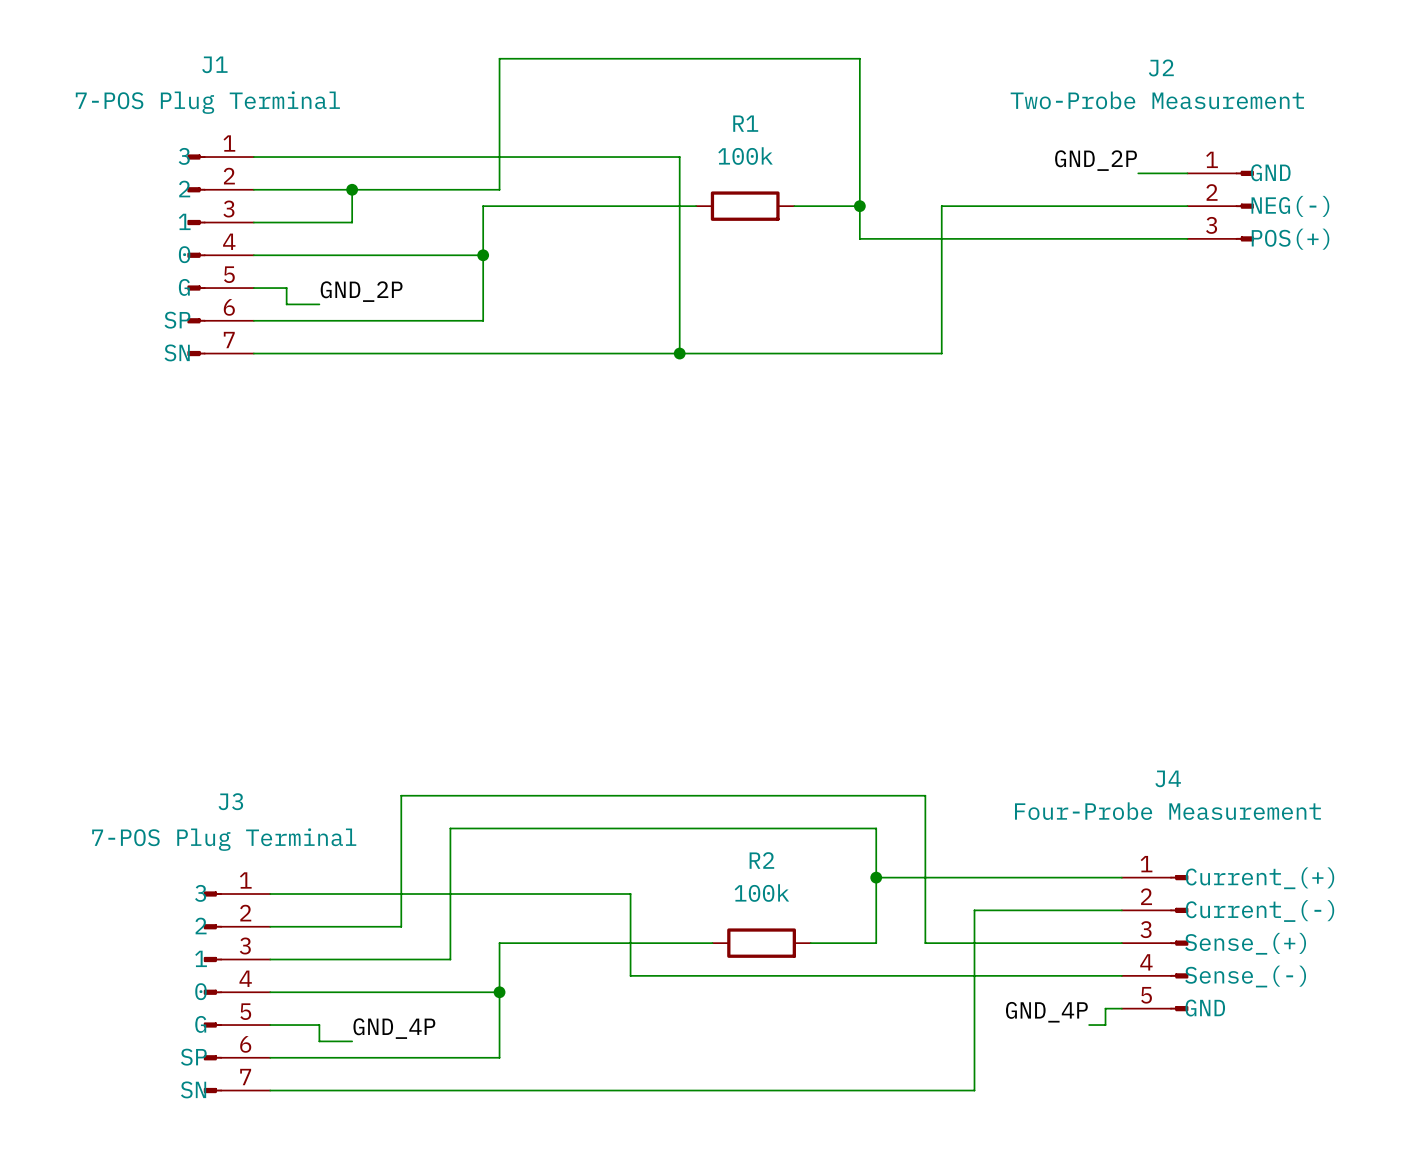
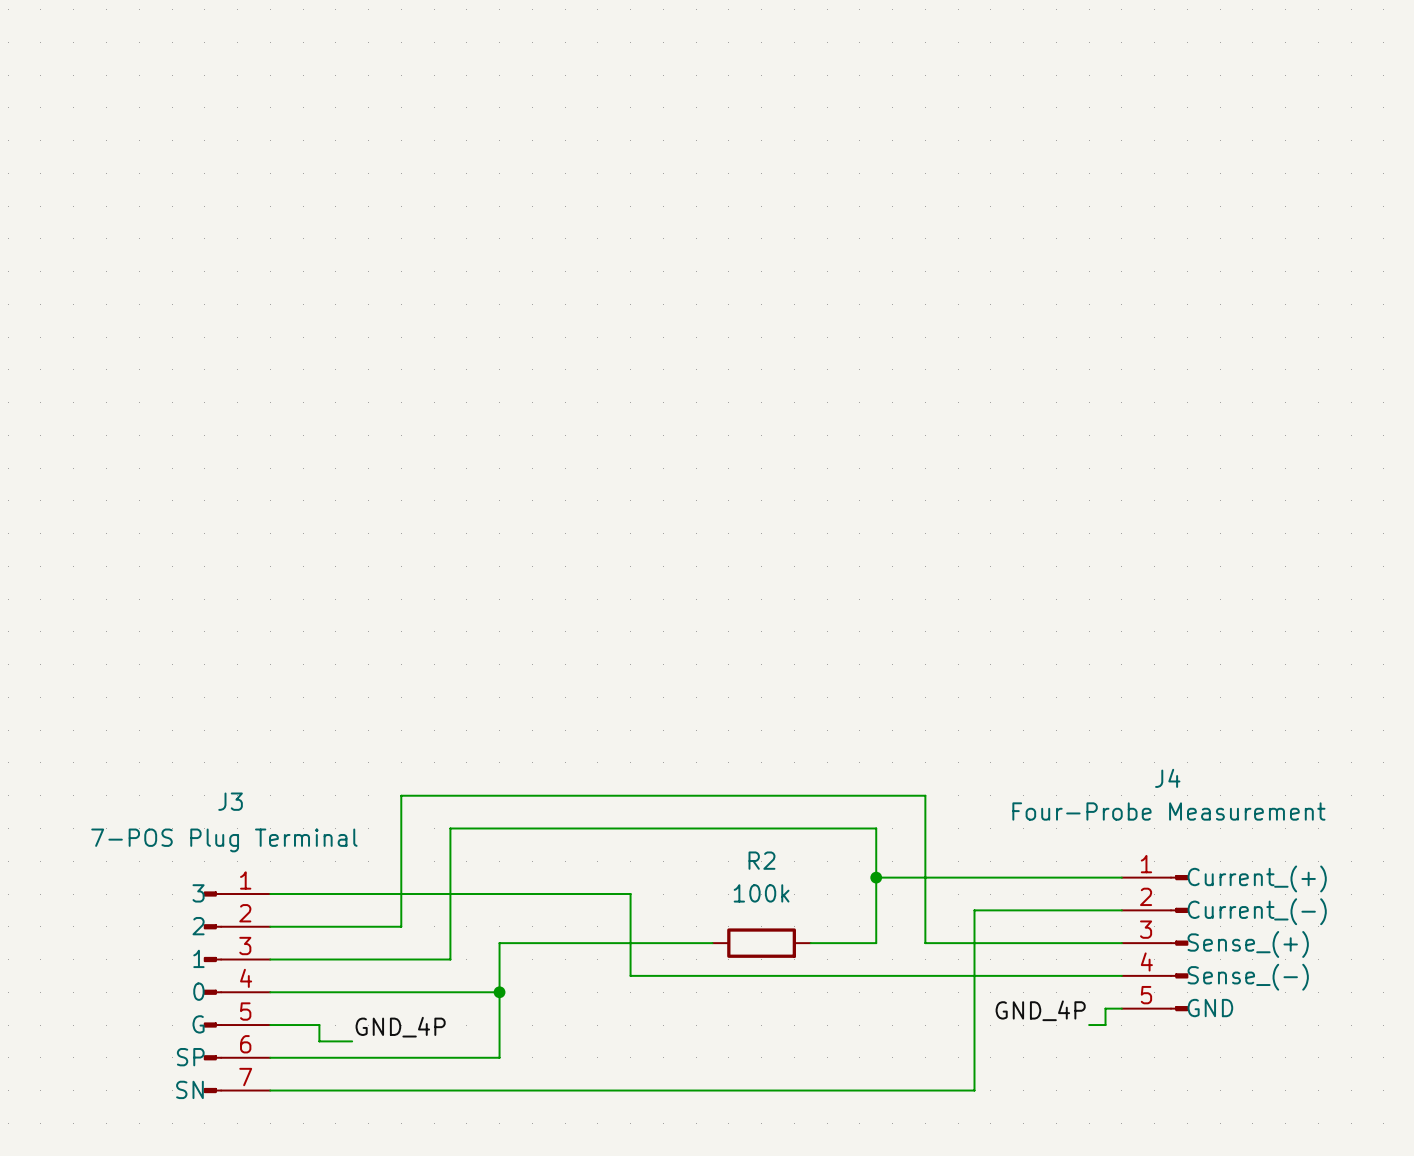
wire: (253, 157) (679, 157) (679, 353) -> none
label: GND_2P (1096, 160) -> none
wire: (1138, 173) (1187, 173) -> none
wire: (253, 189) (499, 189) (499, 58) (859, 58) (859, 238) (1187, 238) -> none
wire: (352, 189) (352, 222) (253, 222) -> none
junction: (352, 189) -> none
wire: (696, 206) (483, 206) (483, 320) (253, 320) -> none
R1: 100k (745, 206) -> none
wire: (794, 206) (859, 206) -> none
junction: (859, 206) -> none
wire: (1187, 206) (941, 206) (941, 353) (253, 353) -> none
J2: Two-Probe Measurement (1220, 206) -> none
J1: 7-POS Plug Terminal (220, 255) -> none
wire: (253, 255) (483, 255) -> none
junction: (483, 255) -> none
wire: (253, 288) (286, 288) (286, 304) (319, 304) -> none
label: GND_2P (361, 291) -> none
junction: (679, 353) -> none

